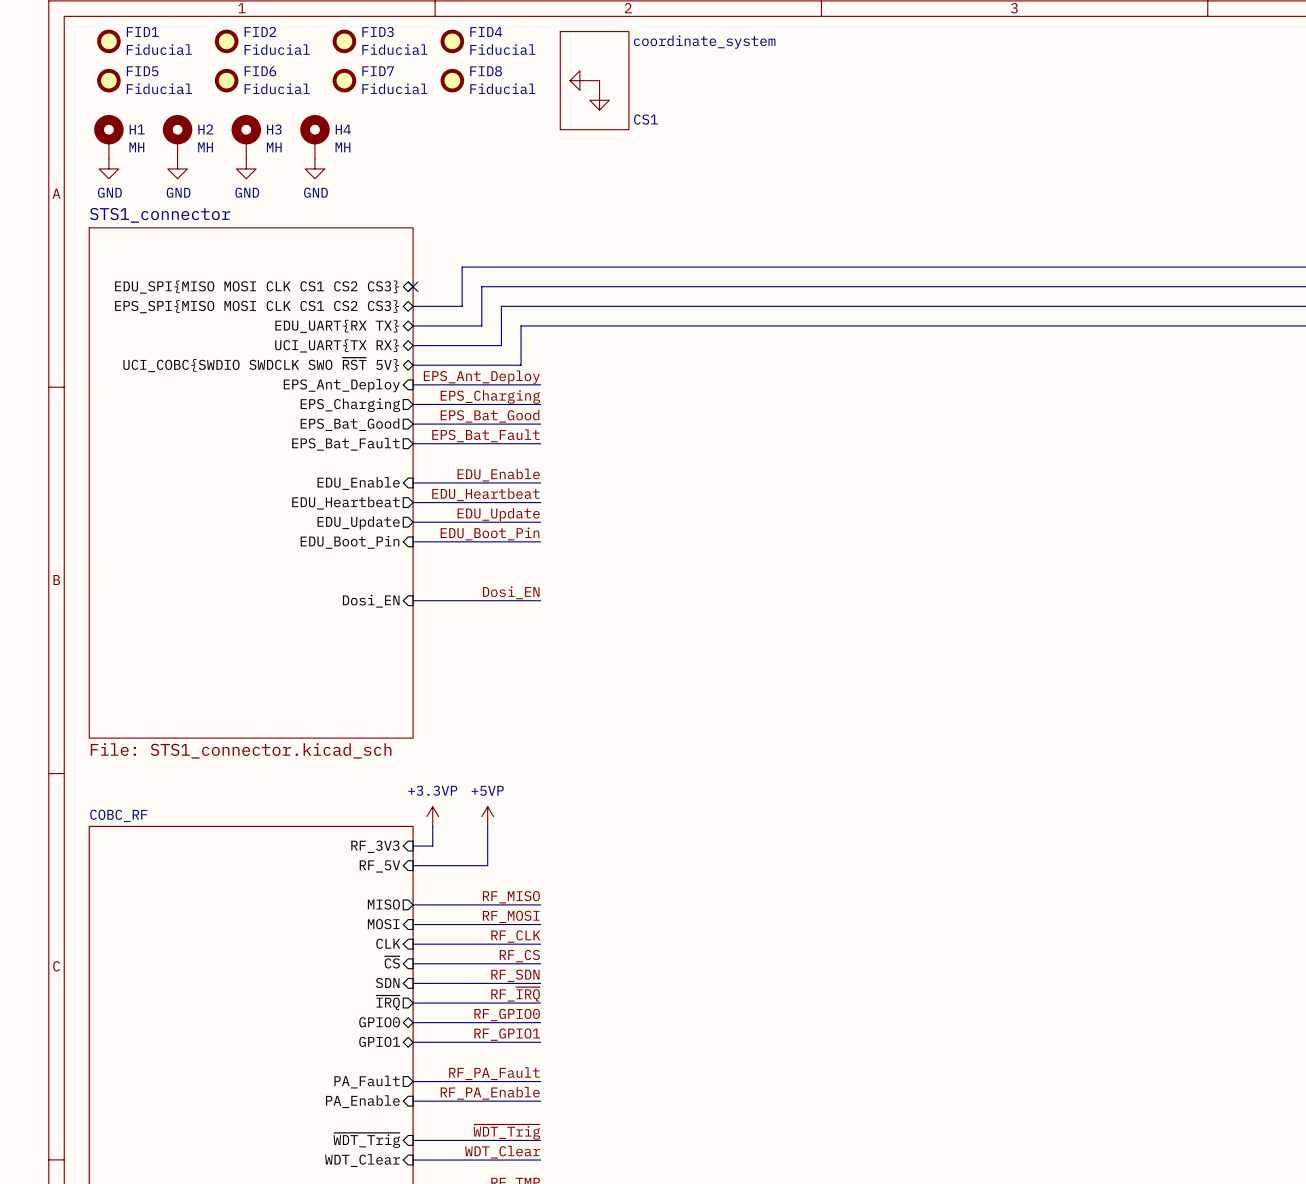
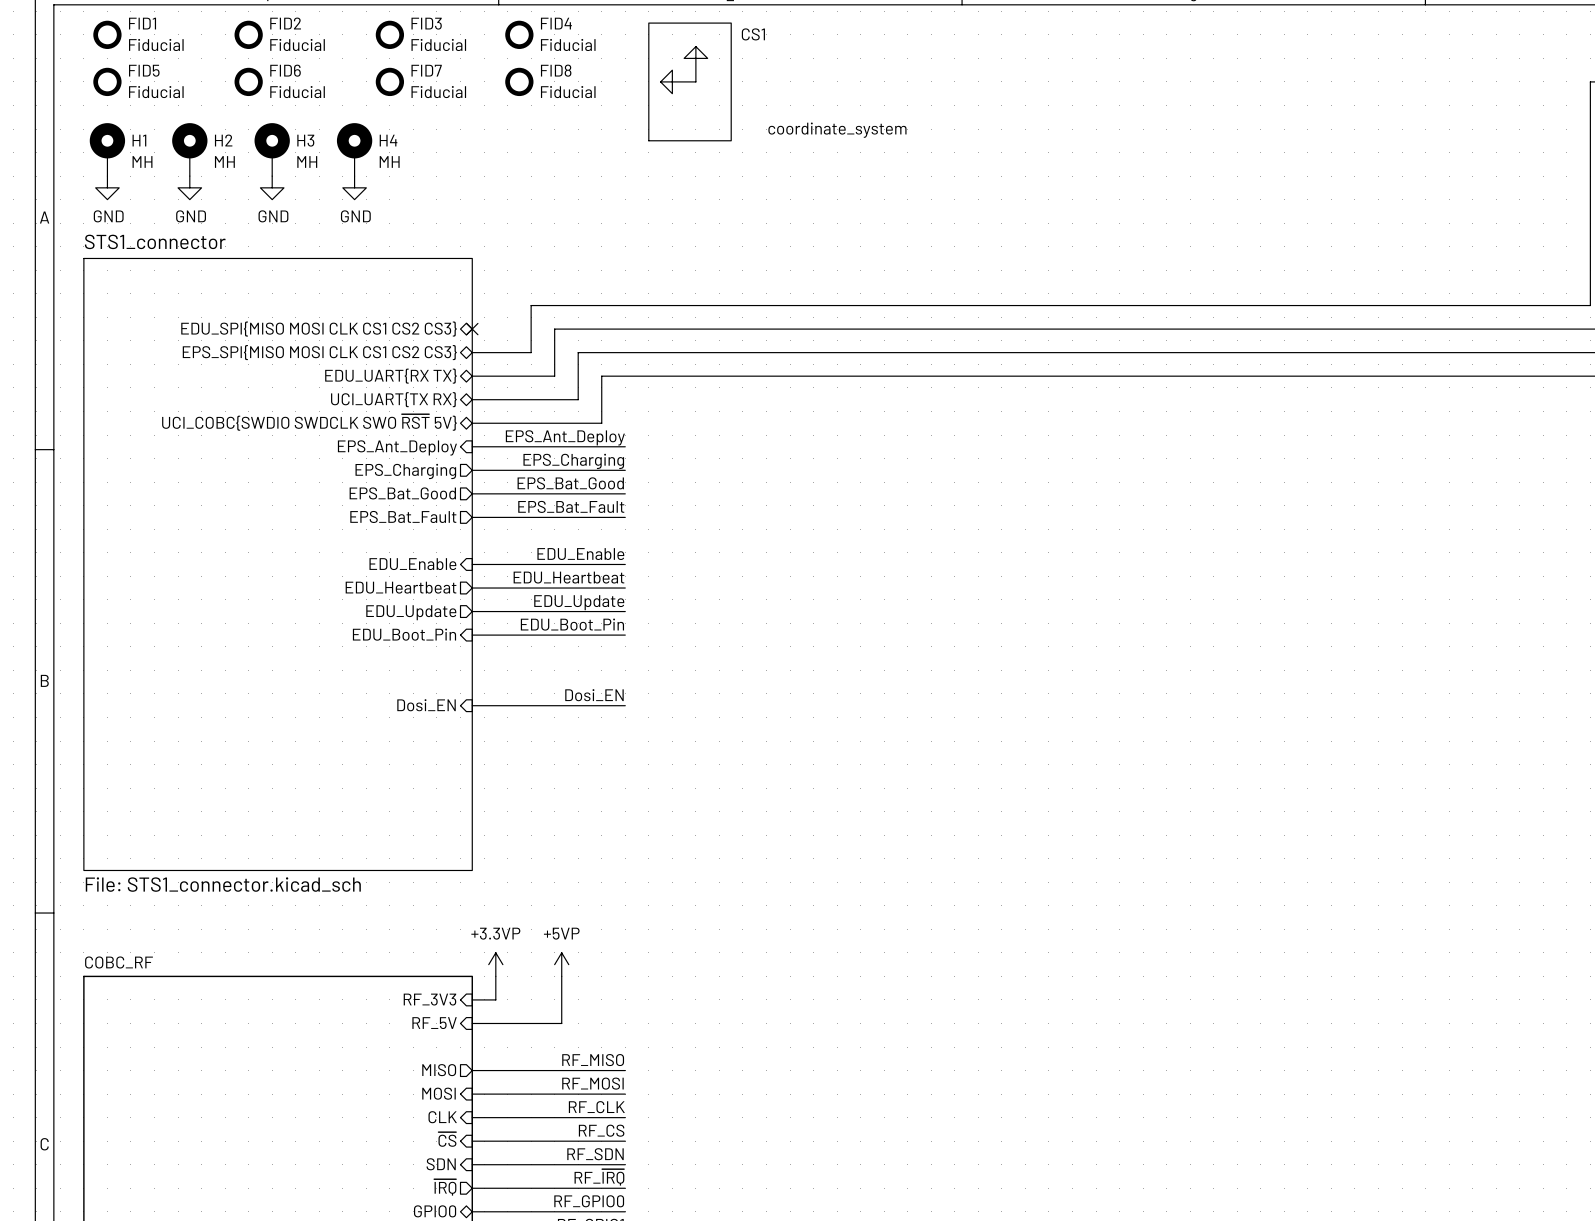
CS1 flip: as is (594, 80) -> up-down (690, 81)

